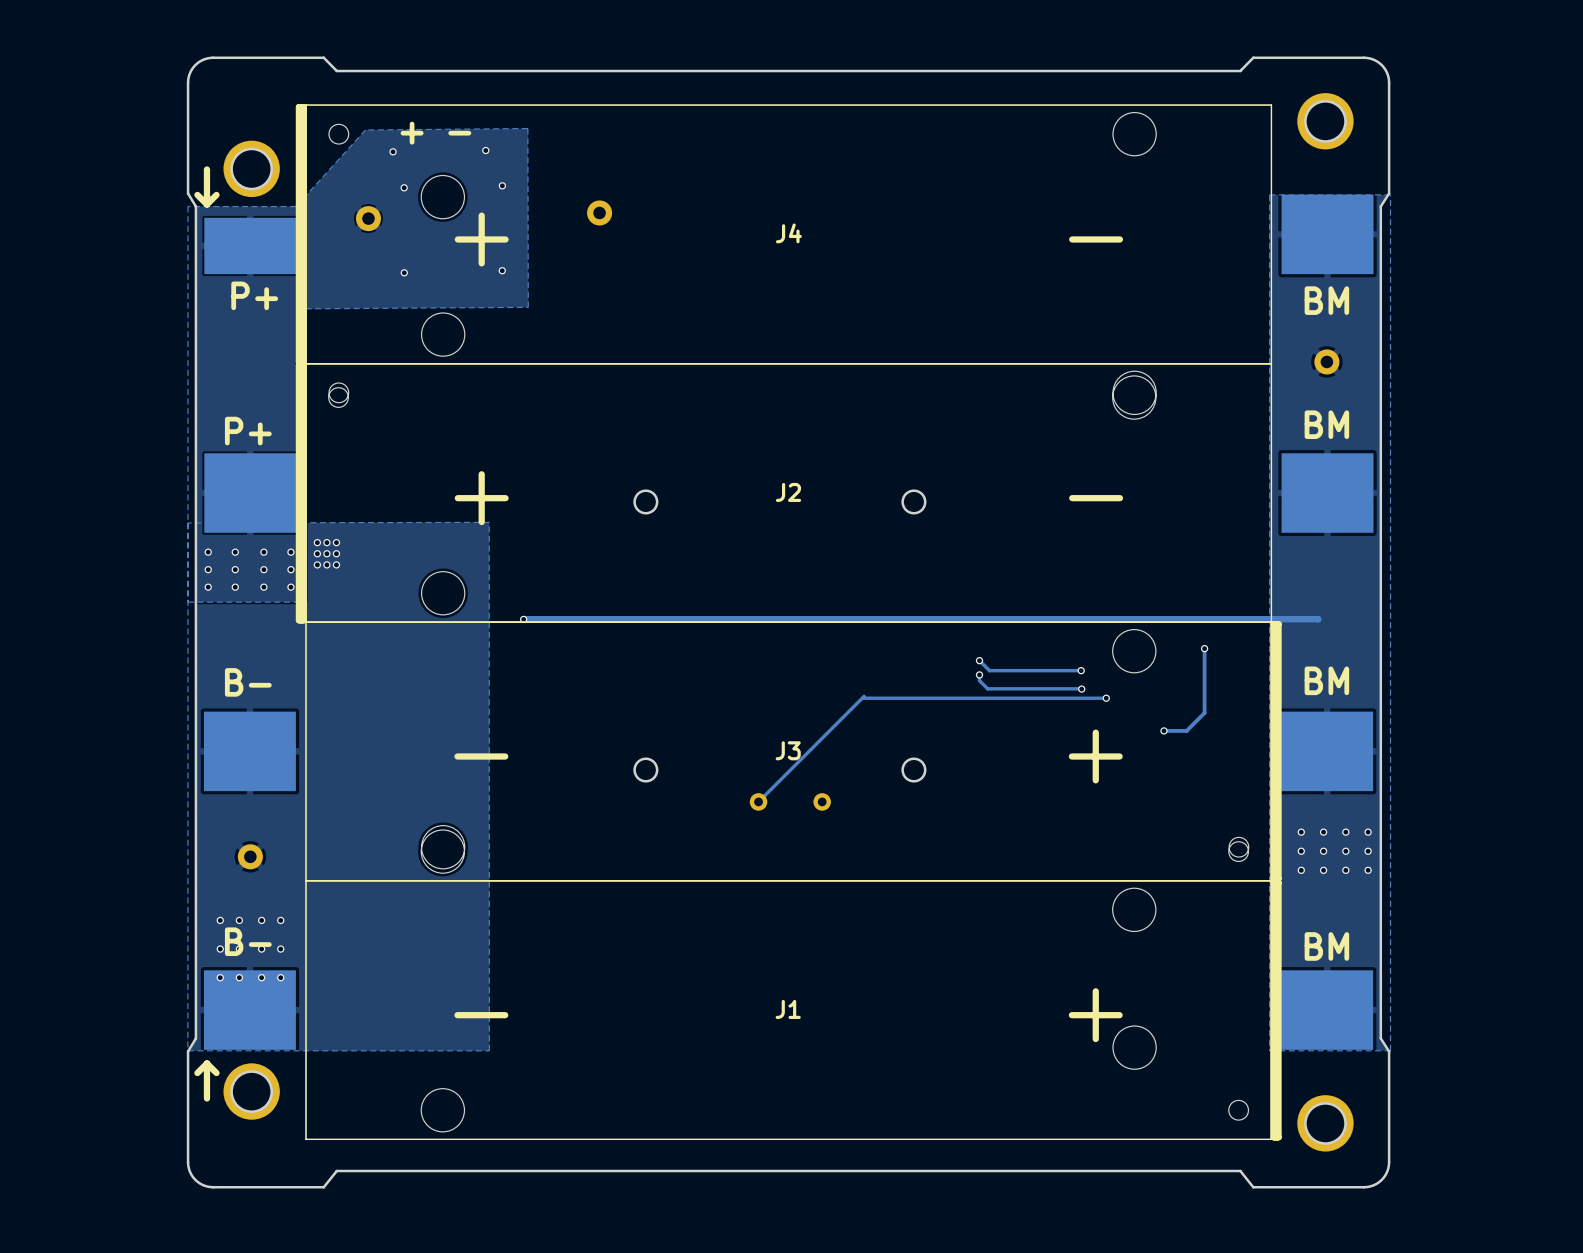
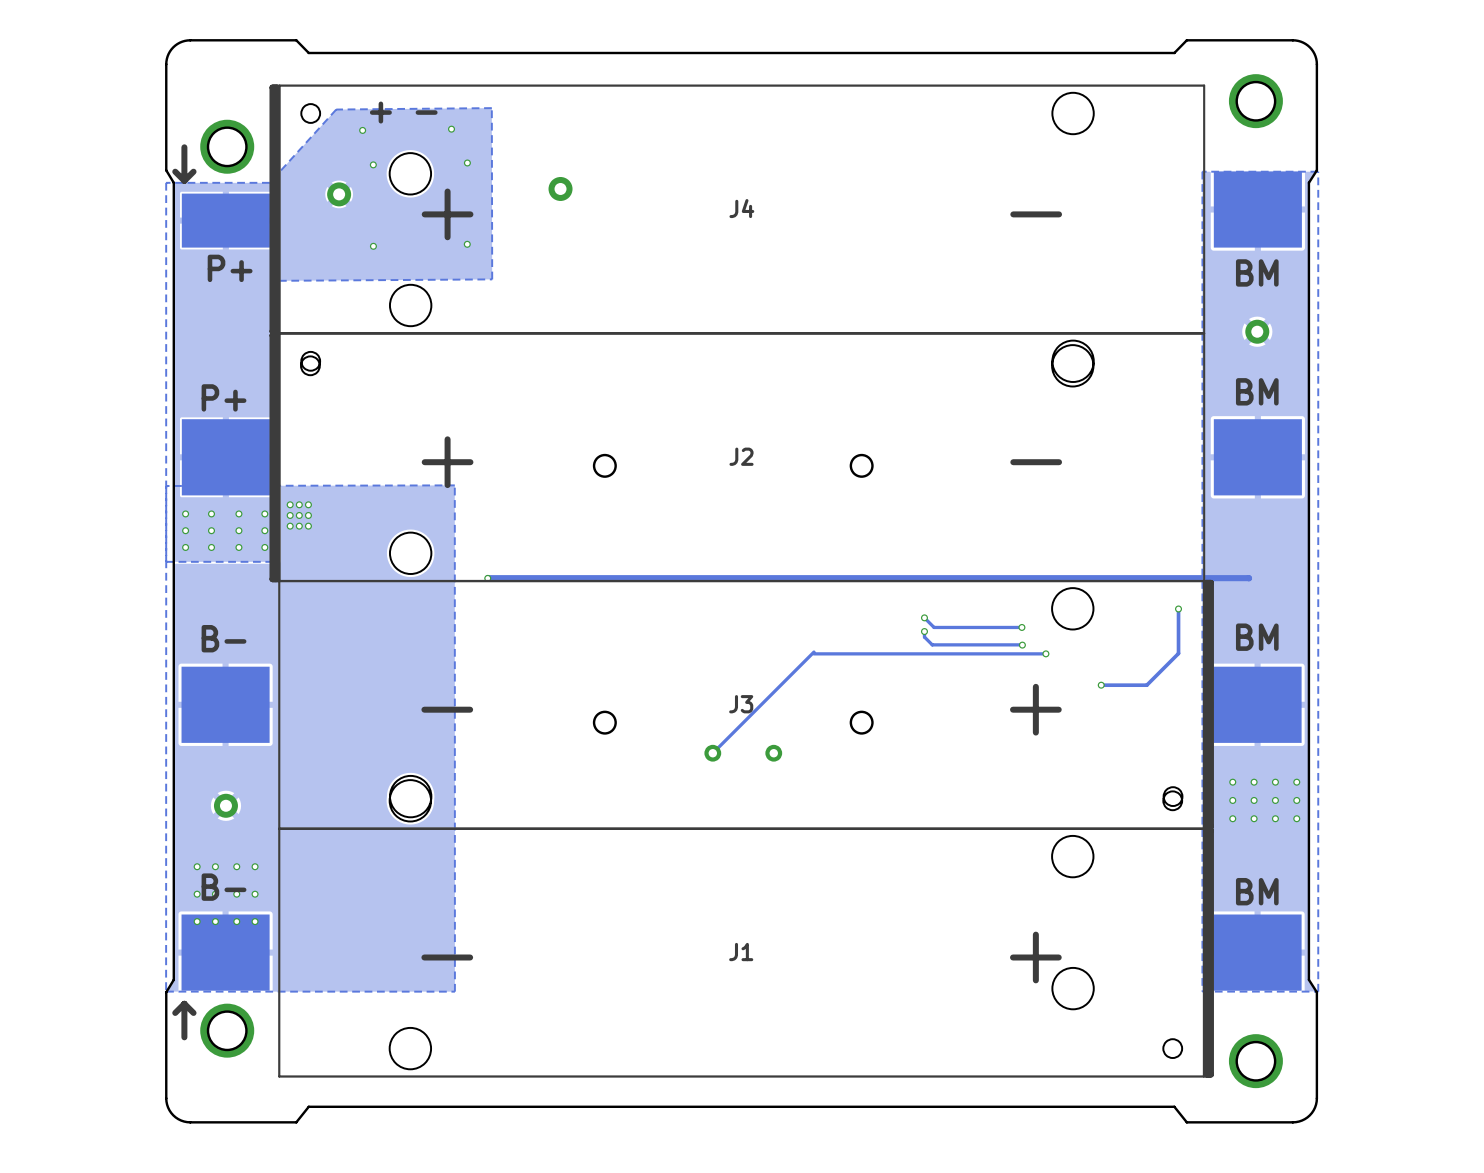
track: (1204, 648) (1204, 713) (1186, 730) -> (1178, 608) (1178, 653) (1146, 685) (1122, 685)
via position: (1204, 648) -> (1178, 608)

